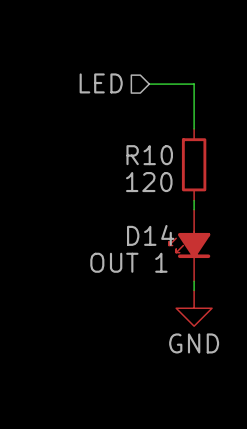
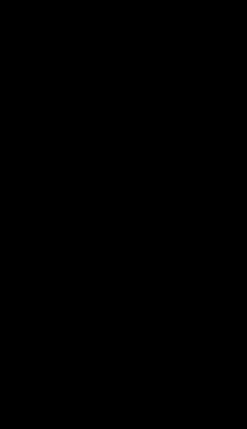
hierarchical label: LED (101, 83) -> none
wire: (149, 84) (194, 84) (194, 128) -> none
R10: 120 (194, 164) -> none
wire: (194, 200) (194, 209) -> none
D14: OUT 1 (189, 245) -> none
wire: (194, 281) (194, 290) -> none
power symbol: GND (194, 308) -> none

